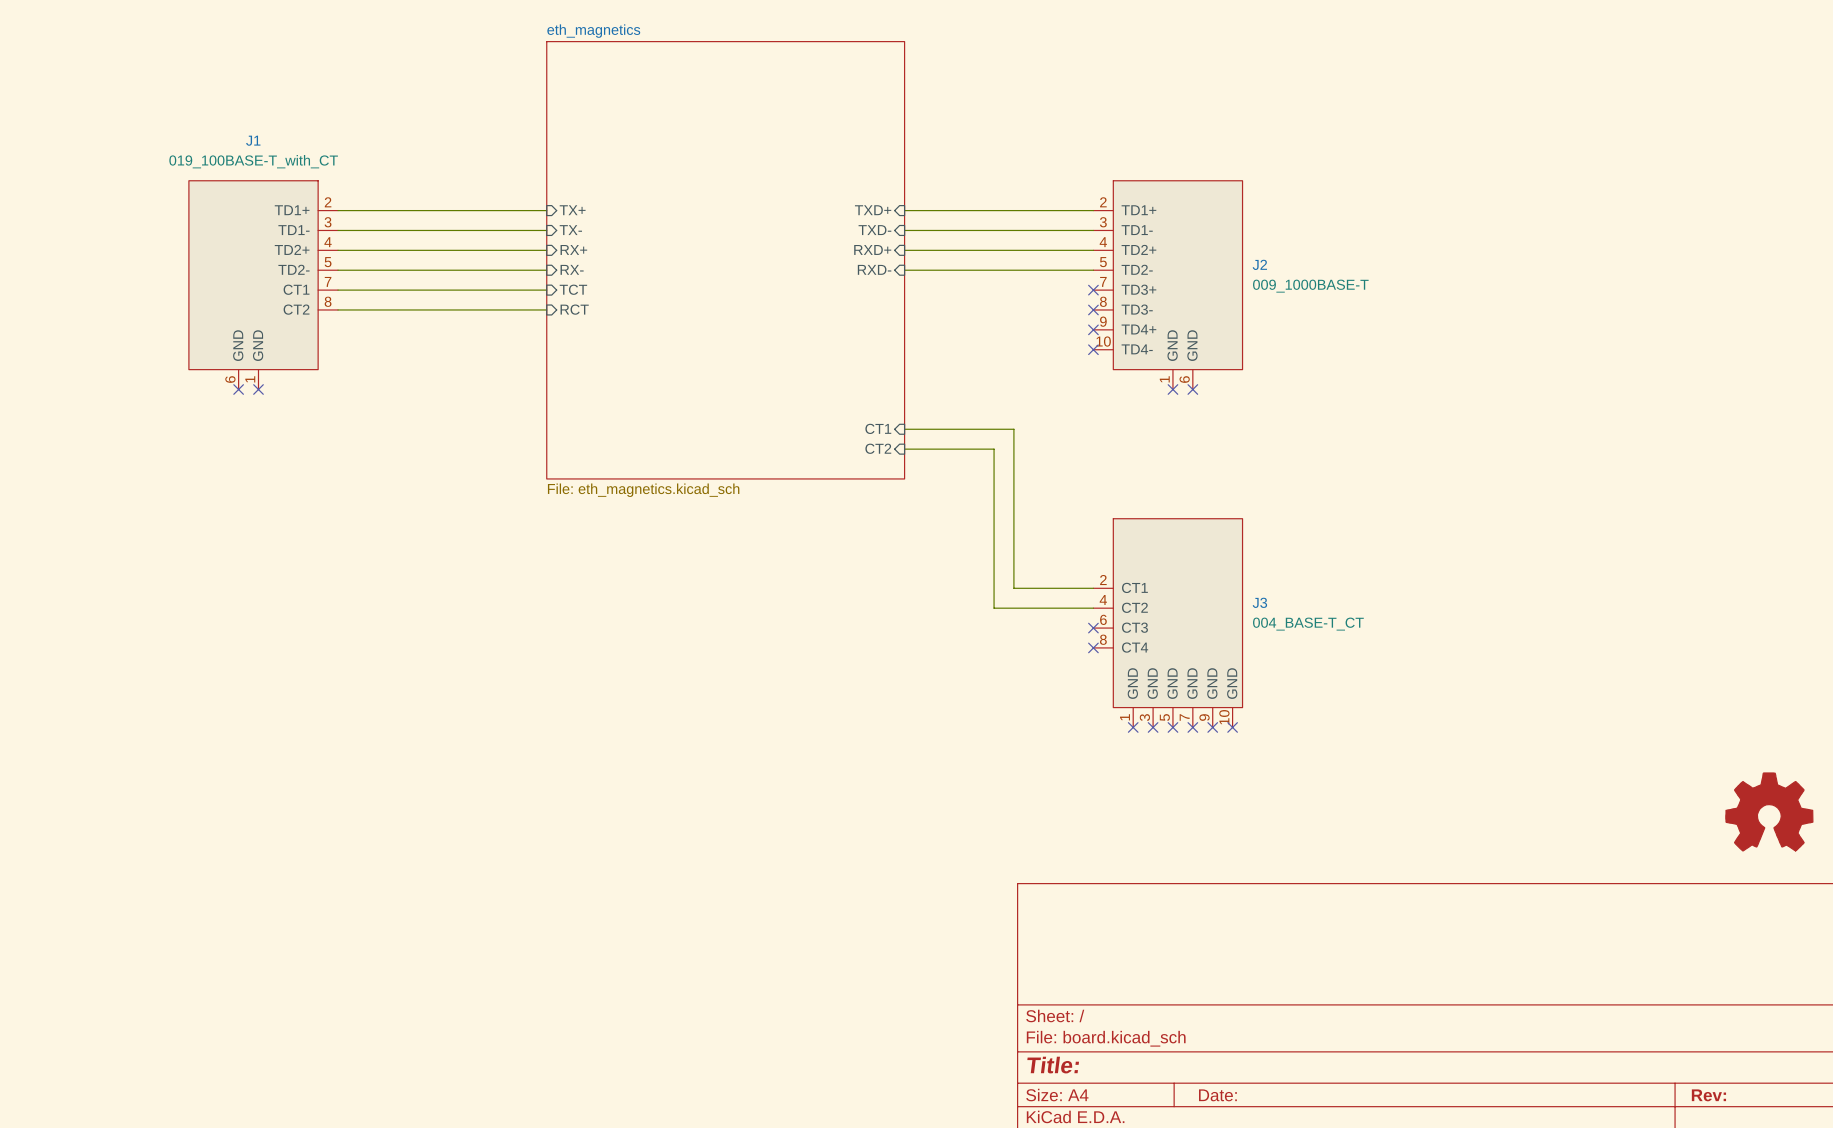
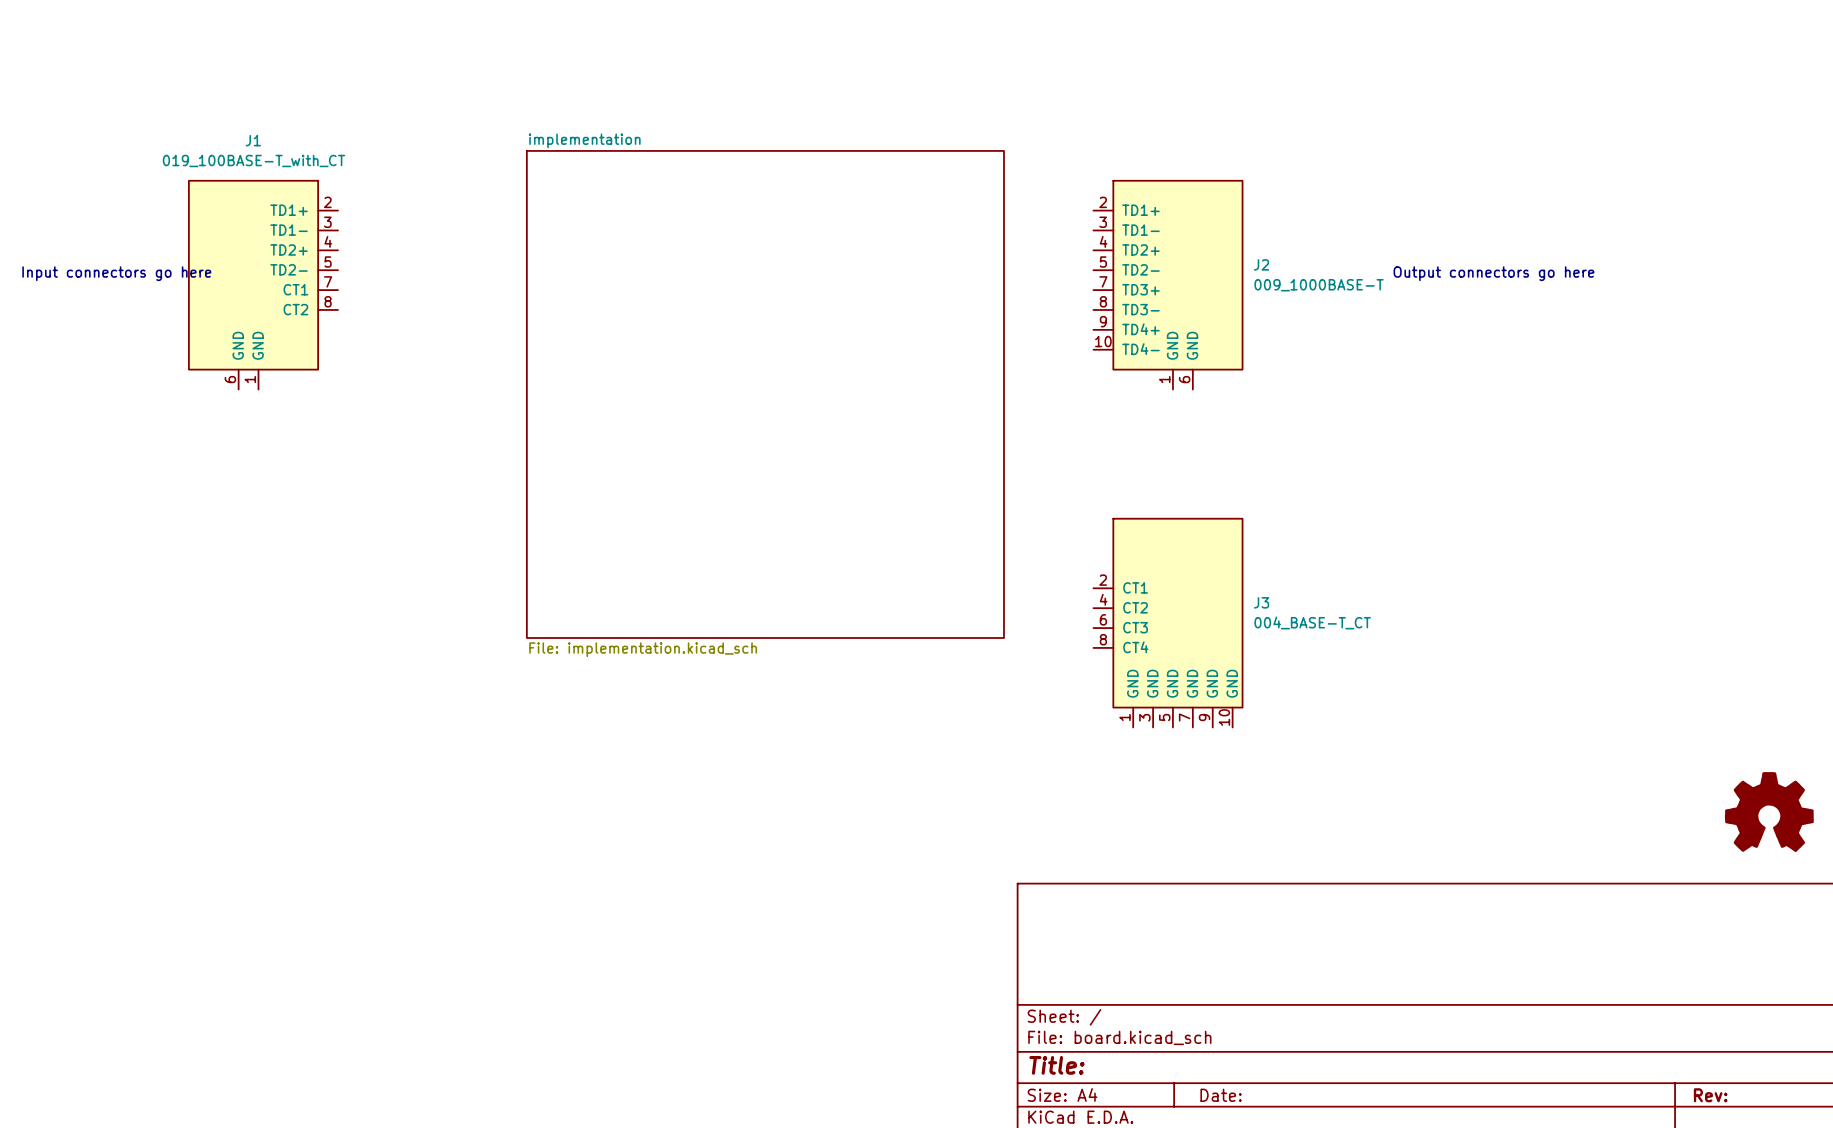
wire: (338, 210) (546, 210) -> none
sheet pin: TX+ (572, 210) -> none
sheet pin: TXD+ (873, 210) -> none
wire: (904, 210) (1093, 210) -> none
wire: (338, 230) (546, 230) -> none
sheet pin: TX- (570, 230) -> none
sheet pin: TXD- (874, 230) -> none
wire: (904, 230) (1093, 230) -> none
sheet pin: RX+ (573, 249) -> none
sheet pin: RXD+ (872, 249) -> none
wire: (338, 250) (546, 250) -> none
wire: (904, 250) (1093, 250) -> none
sheet eth_magnetics: File: eth_magnetics.kicad_sch (725, 260) -> none
sheet pin: RX- (572, 269) -> none
sheet pin: RXD- (874, 269) -> none
wire: (338, 270) (546, 270) -> none
wire: (904, 270) (1093, 270) -> none
text: none -> Input connectors go here (116, 273)
text: none -> Output connectors go here (1493, 273)
sheet pin: TCT (573, 289) -> none
wire: (338, 290) (546, 290) -> none
no-connect mark: (1093, 290) -> none
wire: (338, 309) (546, 309) -> none
sheet pin: RCT (574, 309) -> none
no-connect mark: (1093, 309) -> none
no-connect mark: (1093, 329) -> none
no-connect mark: (1093, 349) -> none
no-connect mark: (238, 389) -> none
no-connect mark: (258, 389) -> none
no-connect mark: (1172, 389) -> none
no-connect mark: (1192, 389) -> none
sheet implementation: none -> File: implementation.kicad_sch (765, 394)
sheet pin: CT1 (878, 428) -> none
wire: (904, 429) (1013, 429) (1013, 588) (1093, 588) -> none
sheet pin: CT2 (878, 448) -> none
wire: (904, 449) (994, 449) (994, 608) (1093, 608) -> none
no-connect mark: (1093, 628) -> none
no-connect mark: (1093, 647) -> none
no-connect mark: (1133, 727) -> none
no-connect mark: (1153, 727) -> none
no-connect mark: (1172, 727) -> none
no-connect mark: (1192, 727) -> none
no-connect mark: (1212, 727) -> none
no-connect mark: (1232, 727) -> none

